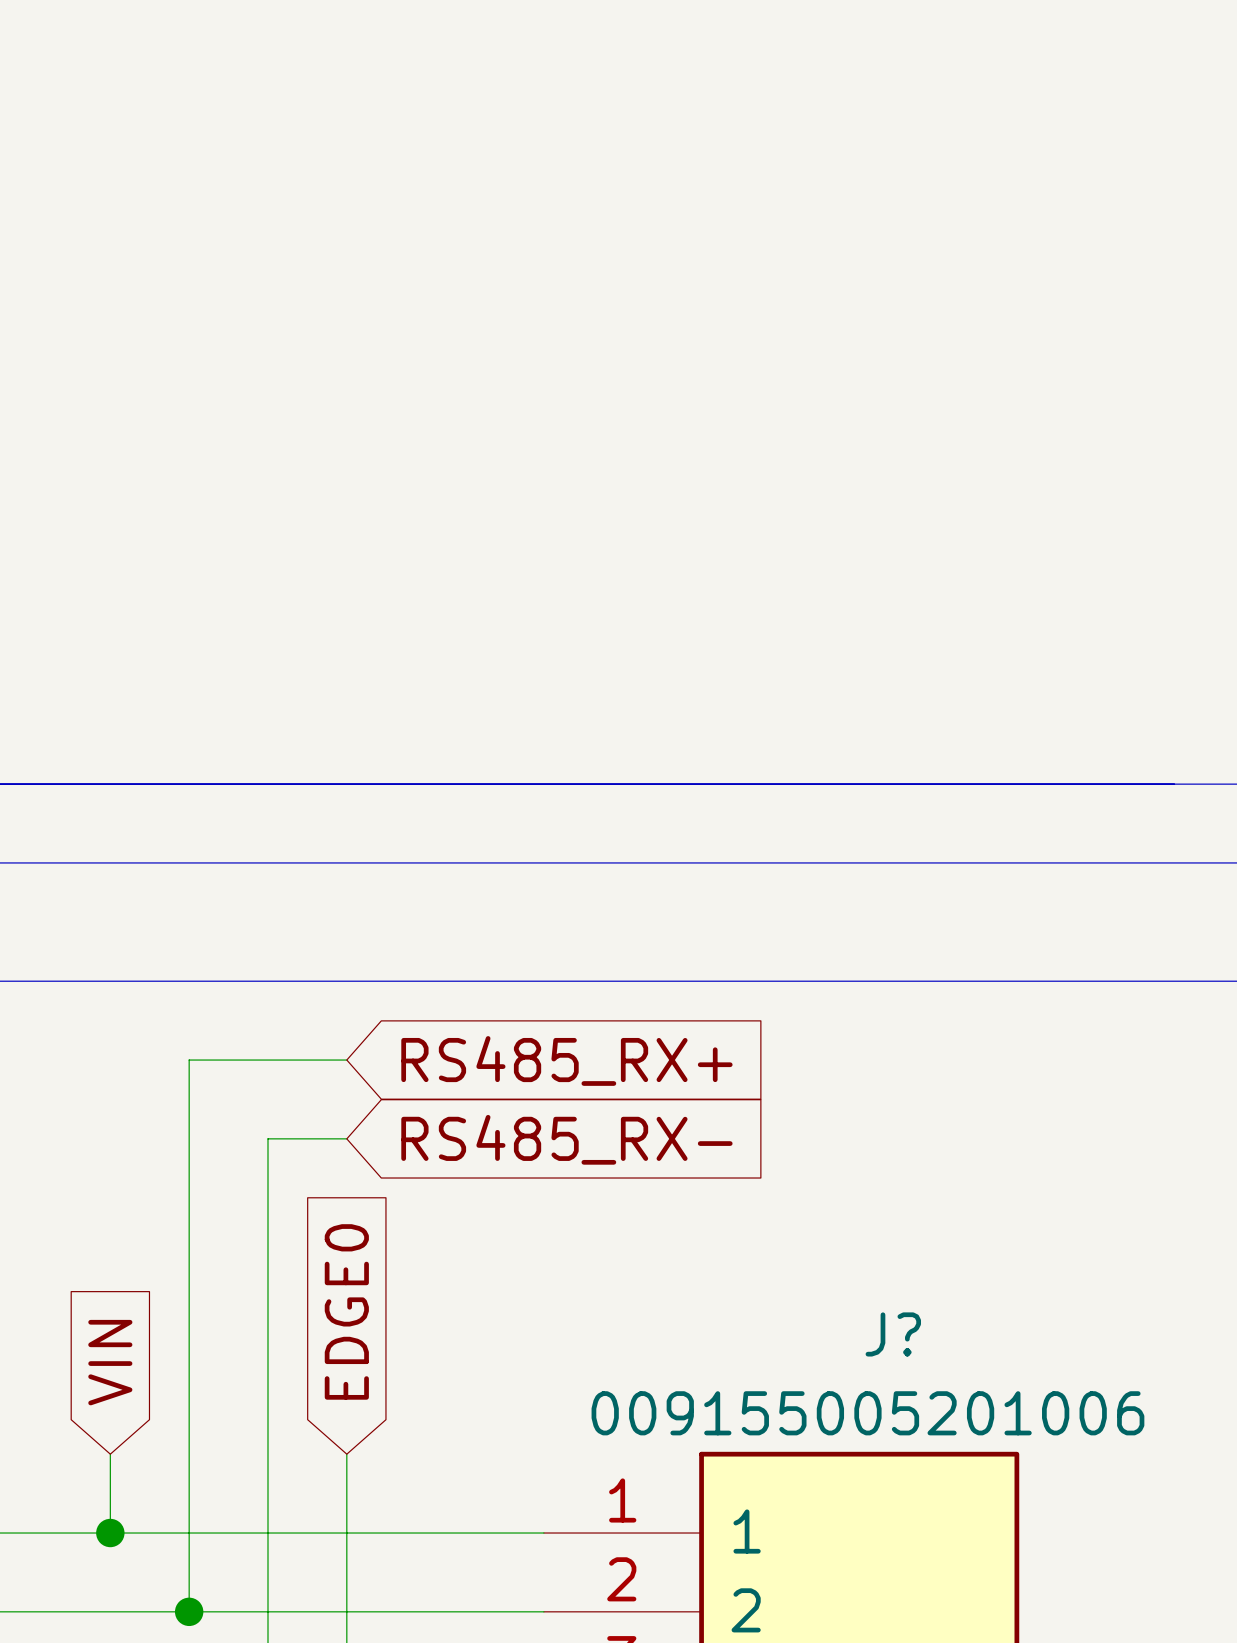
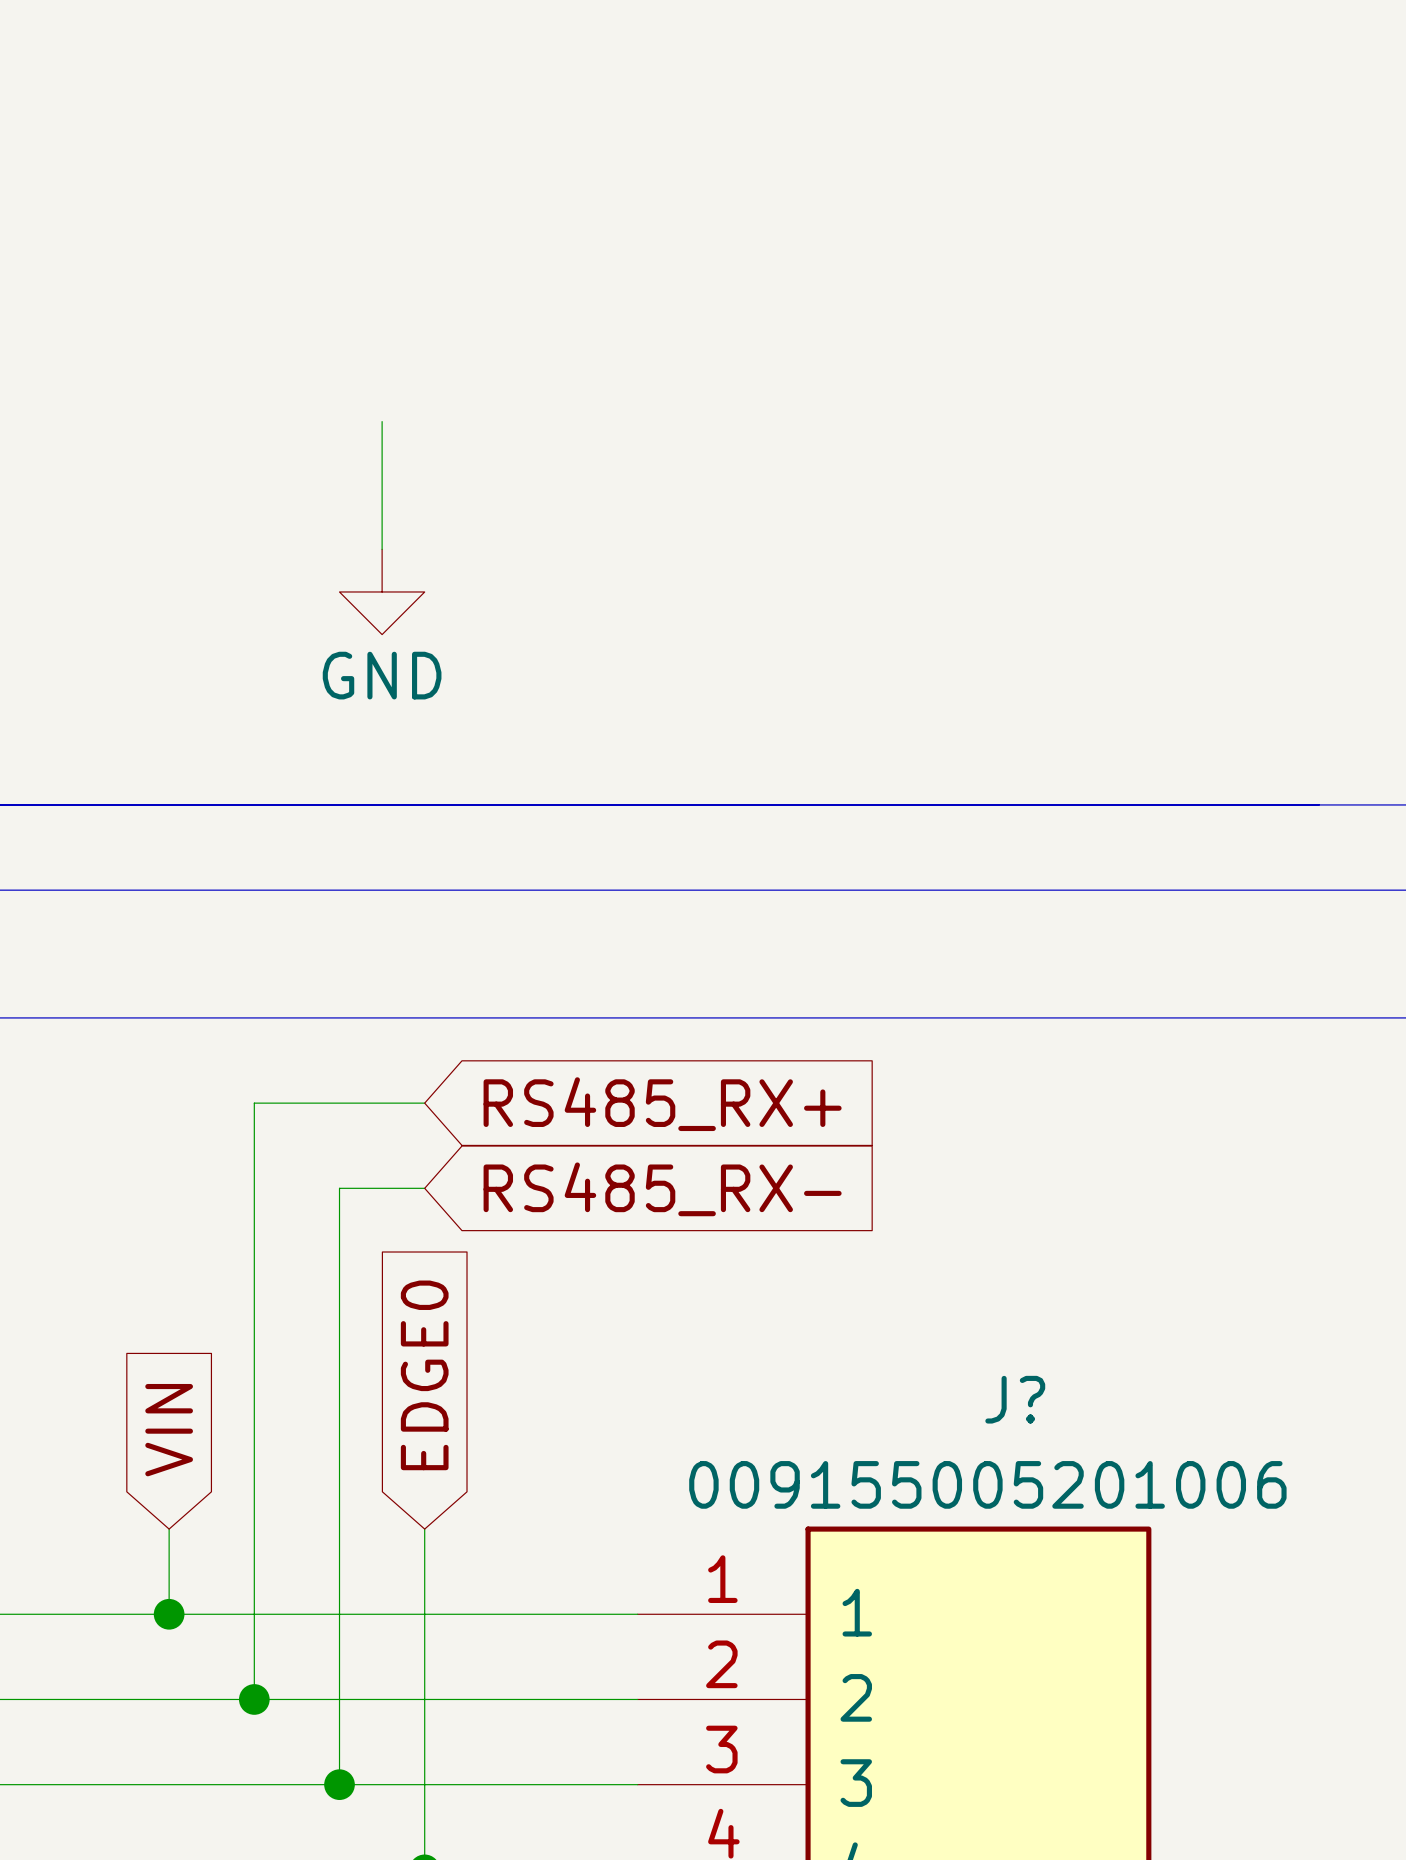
wire: none -> (382, 421) (382, 549)
power symbol: none -> GND (382, 591)

